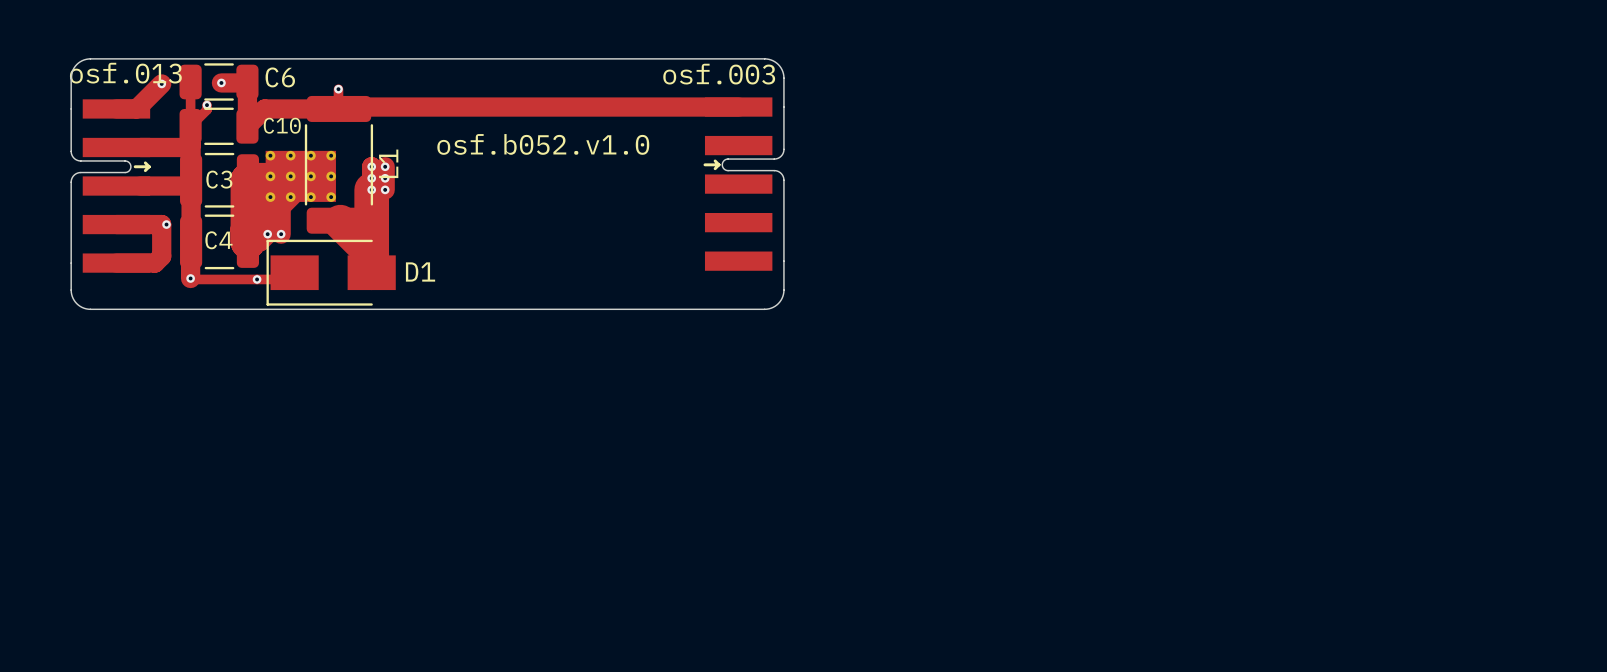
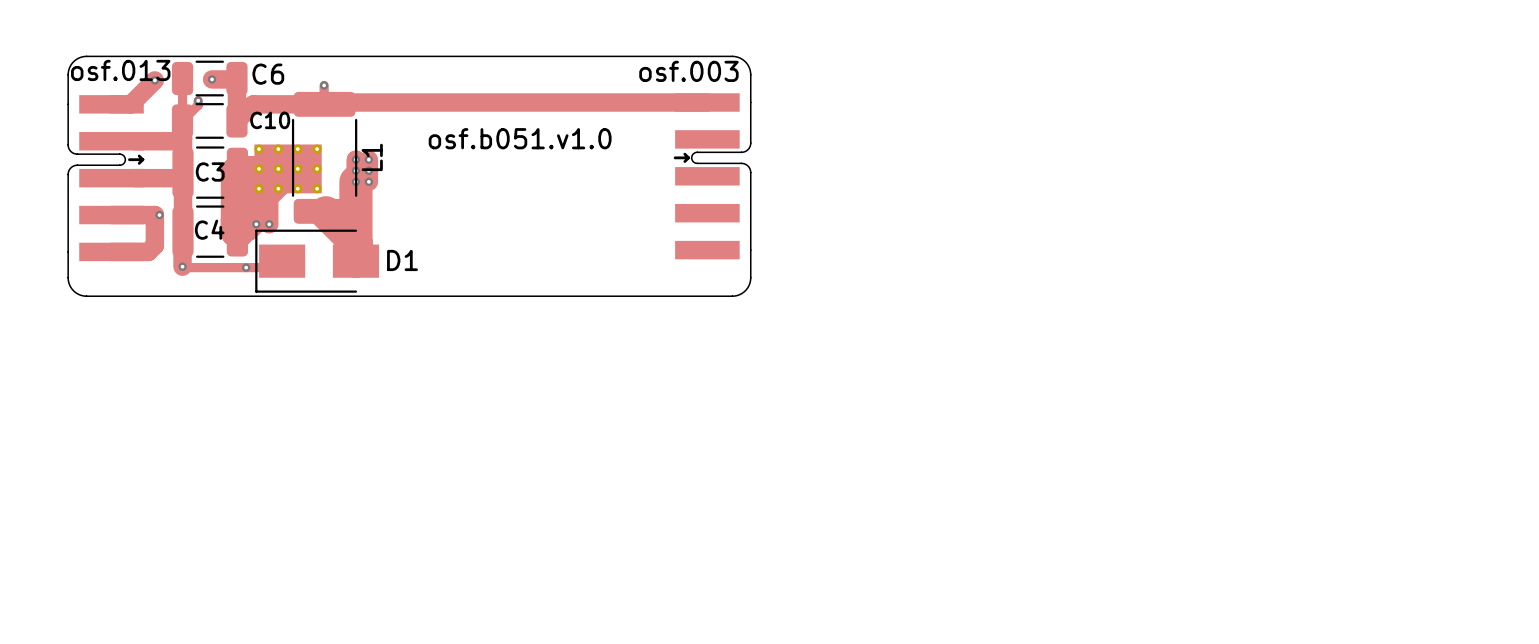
text: osf.b052.v1.0 (543, 144) -> osf.b051.v1.0 (520, 138)

